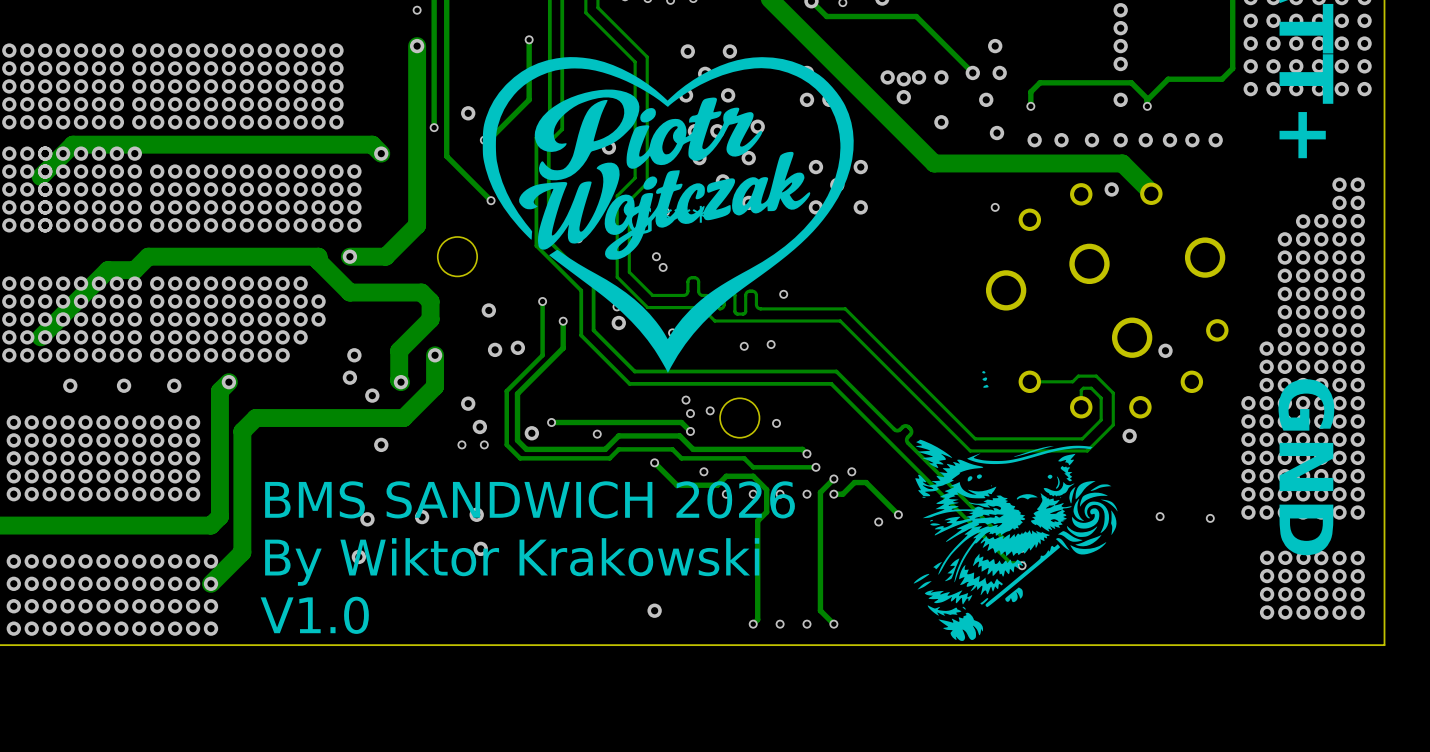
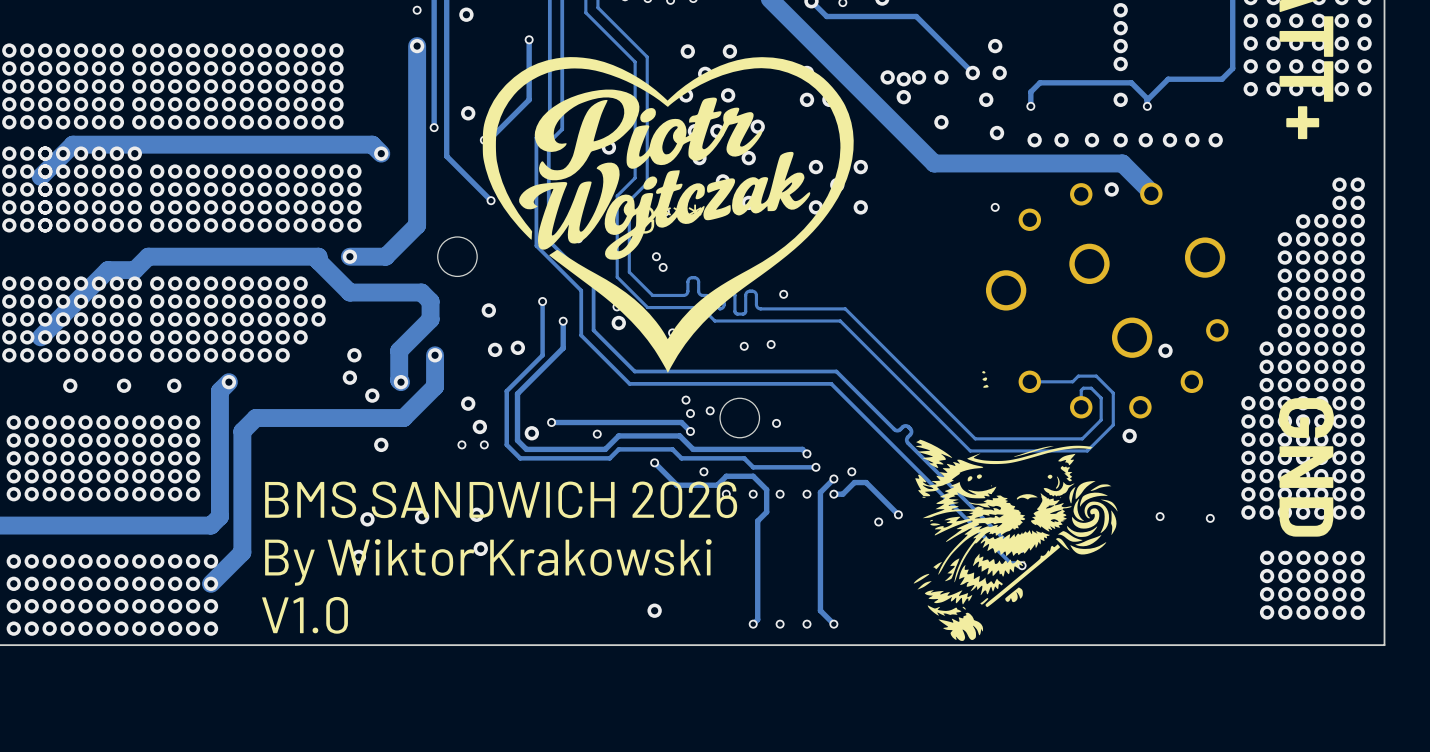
via: none -> (466, 14)

